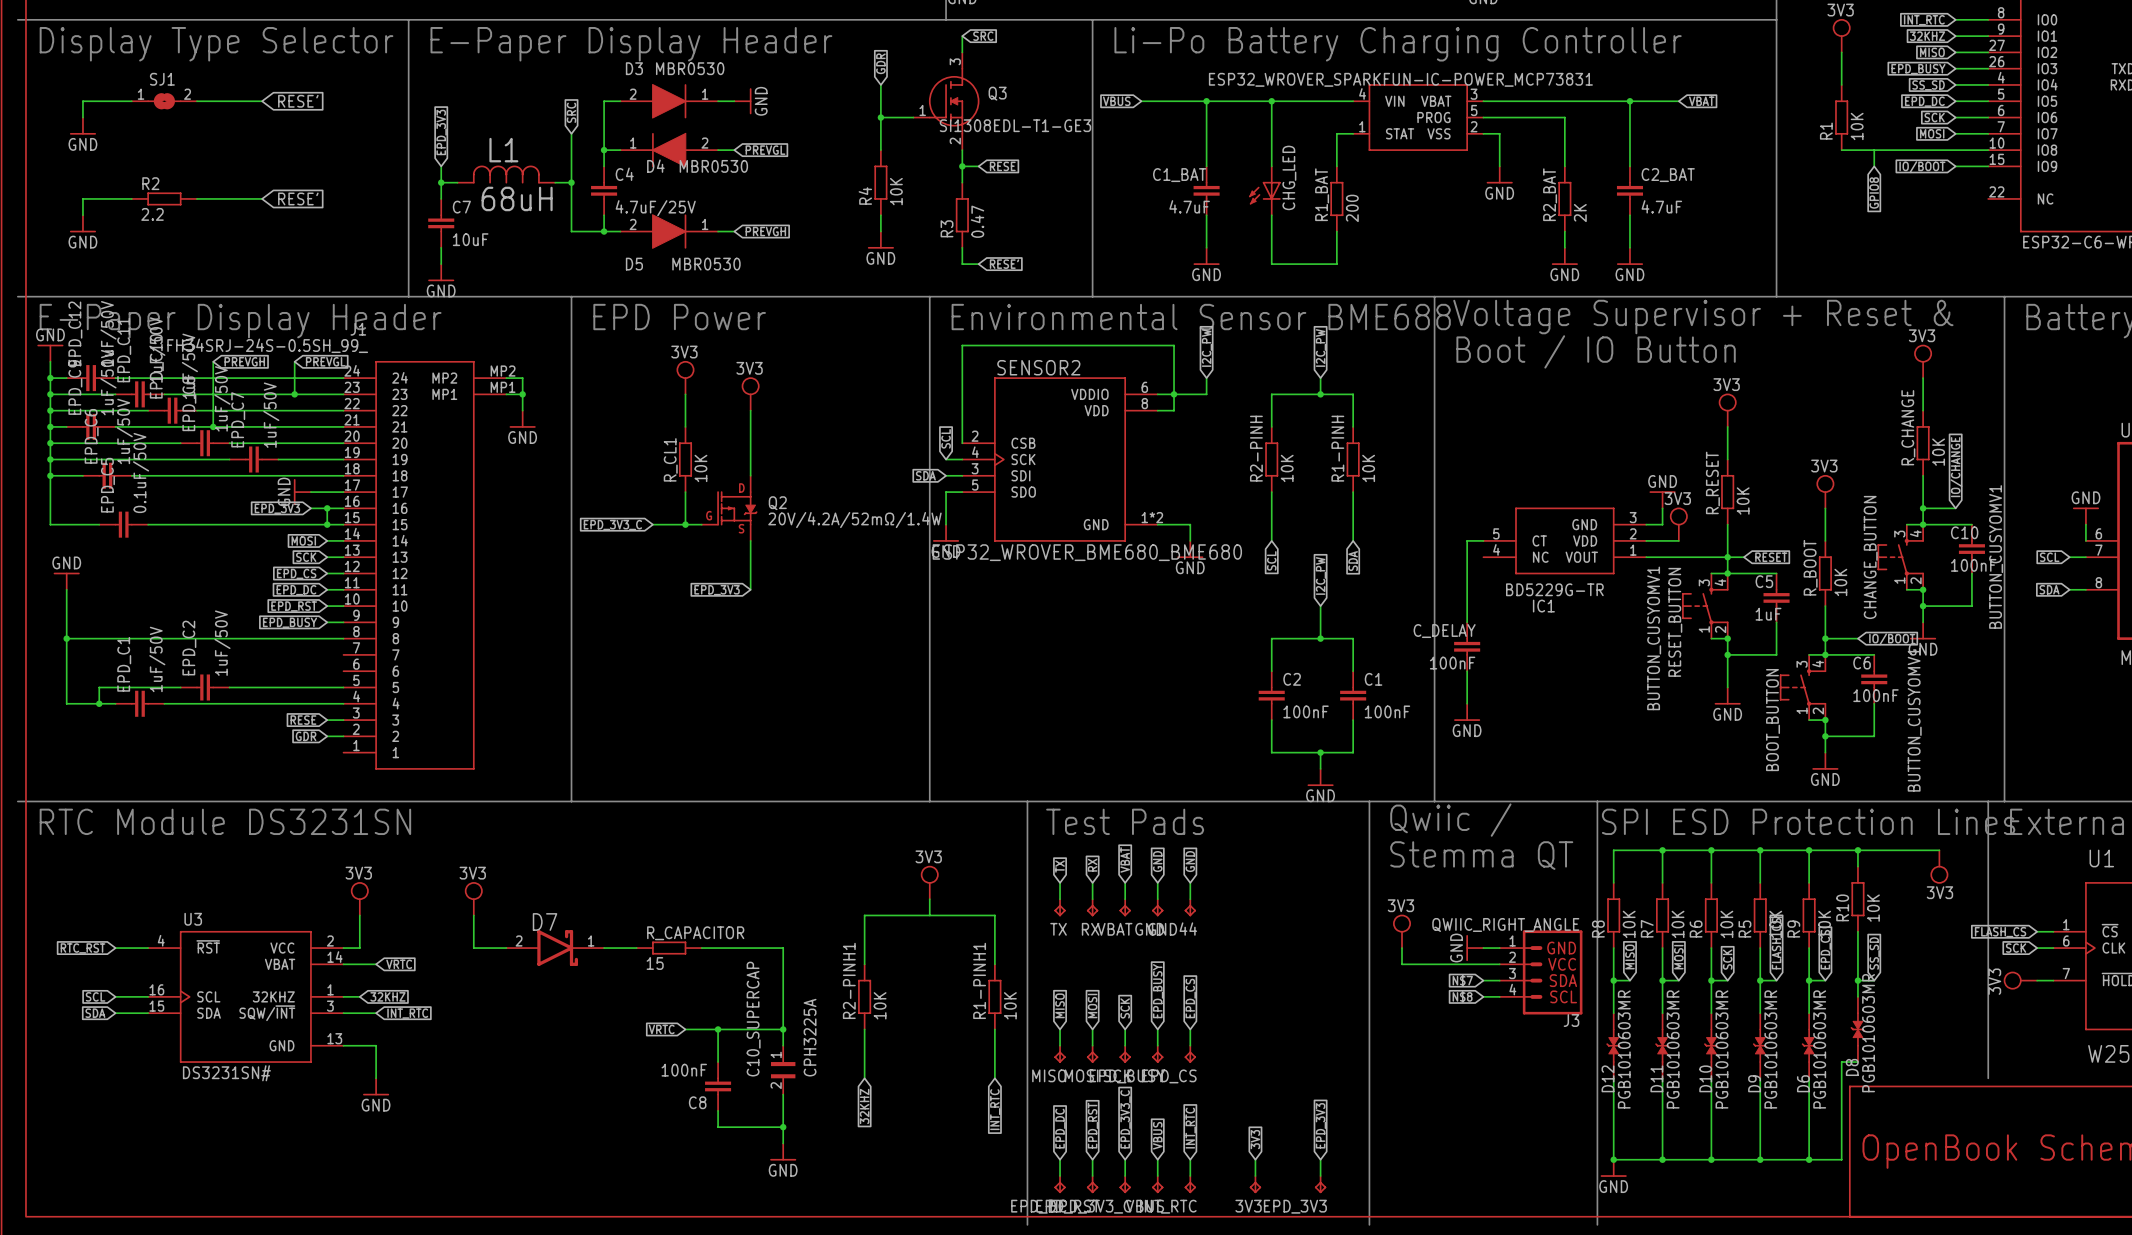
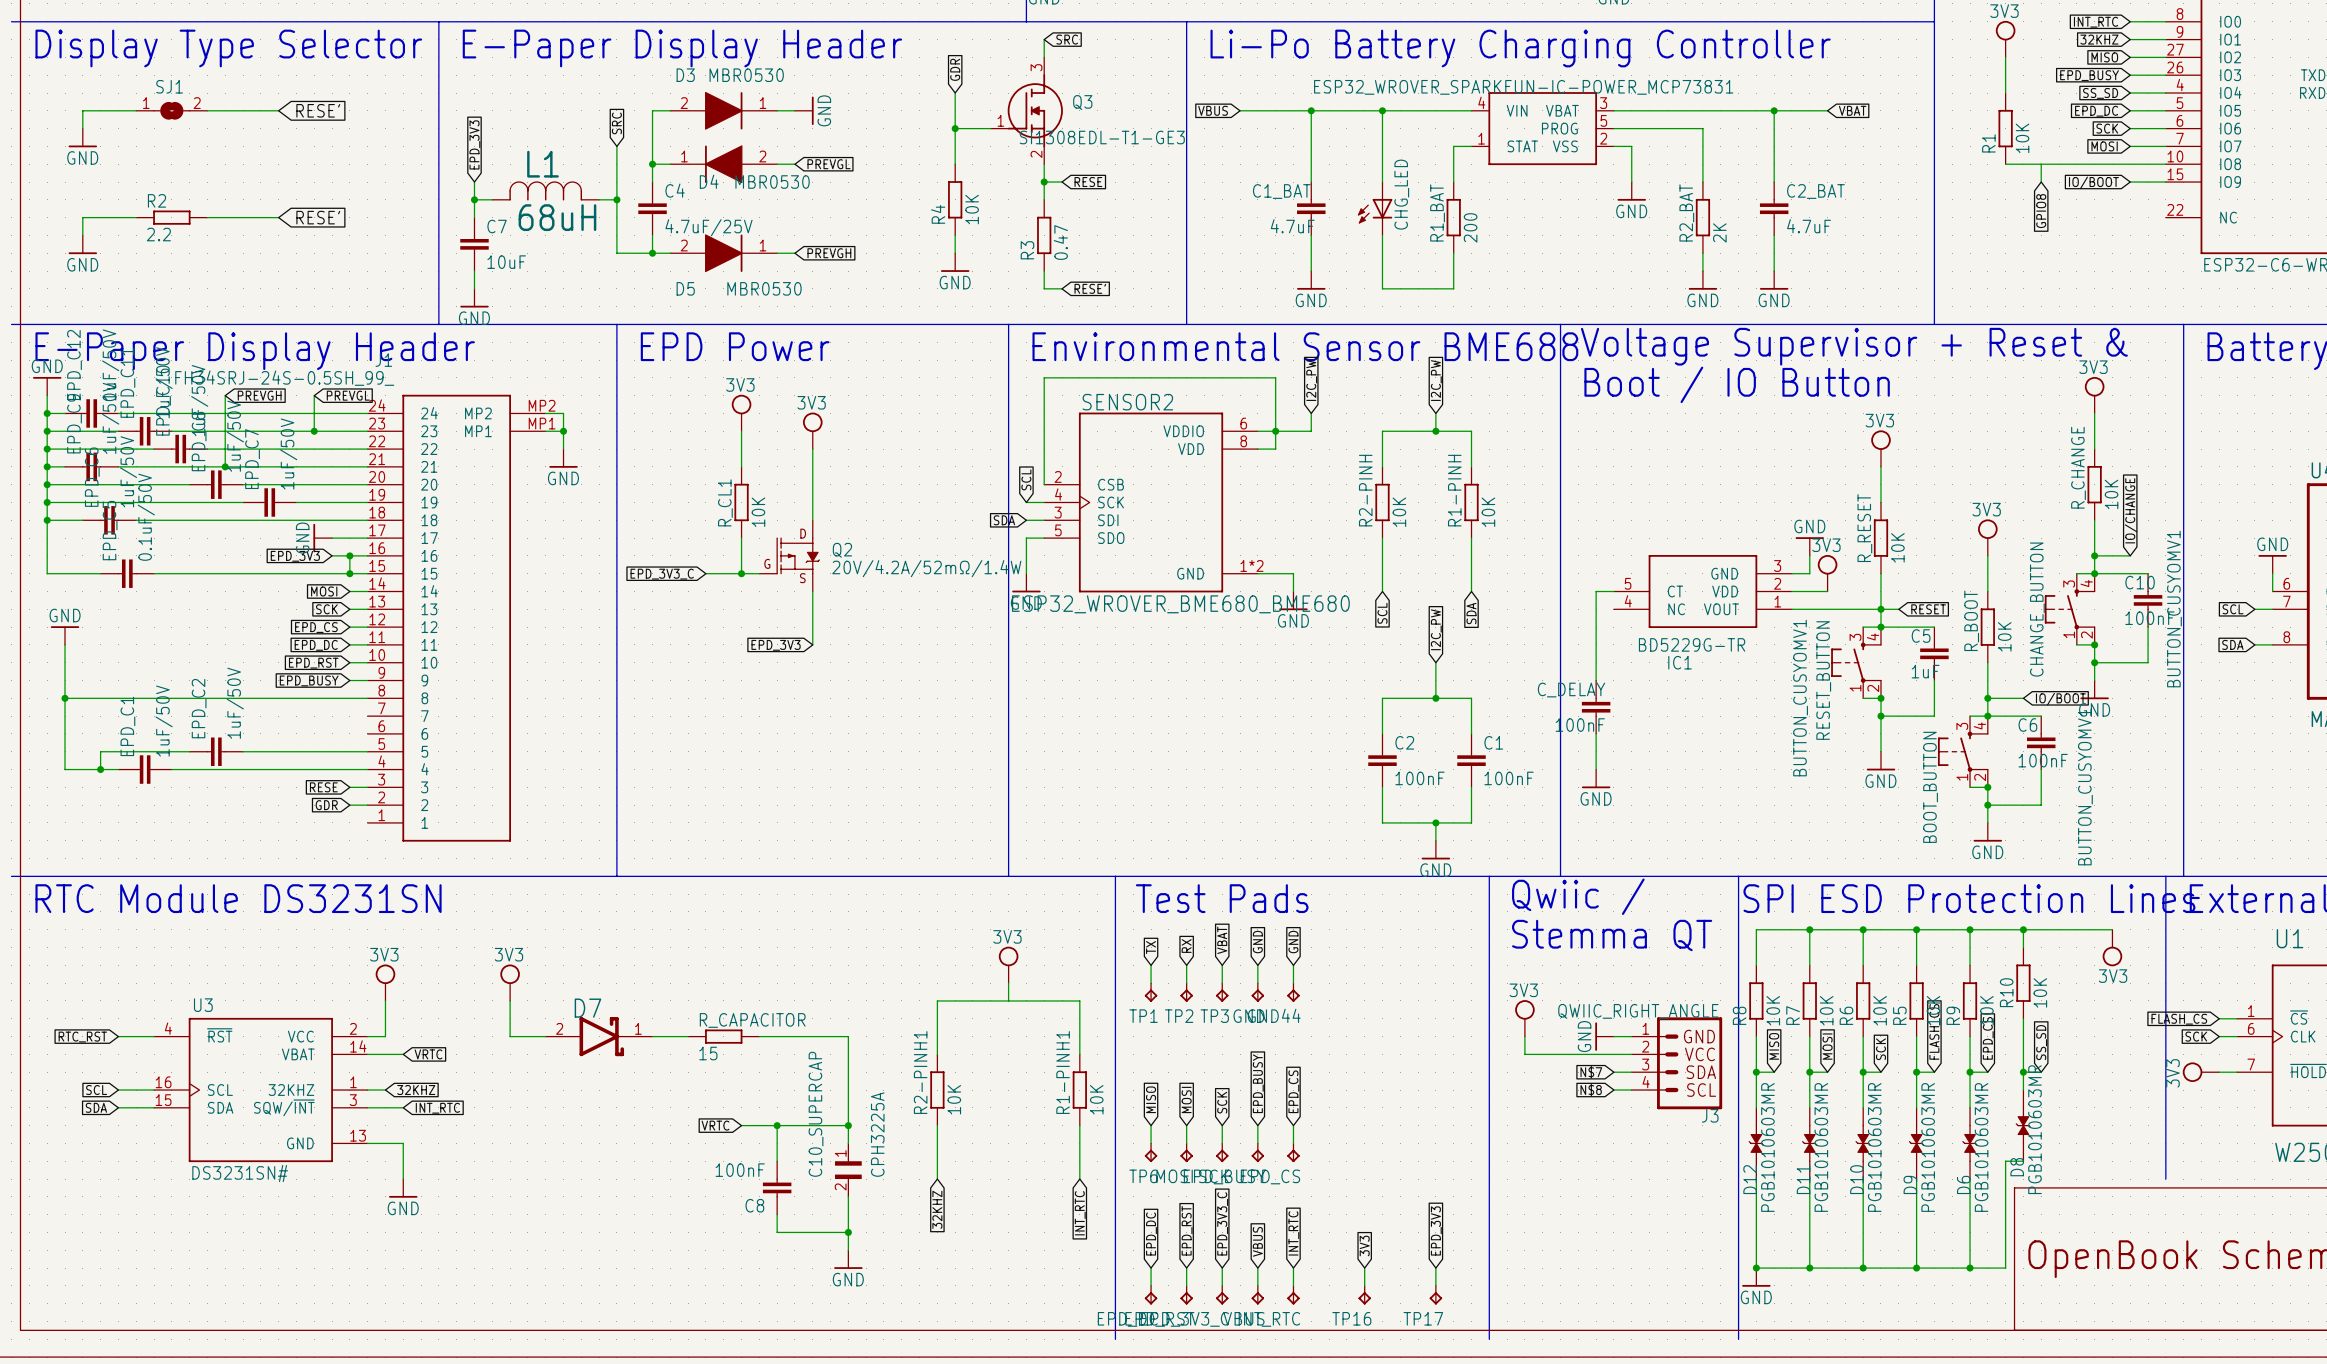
TX name: TX (1058, 929) -> TP1 (1143, 1016)
RX name: RX (1090, 929) -> TP2 (1179, 1016)
VBAT name: VBAT (1114, 929) -> TP3 (1214, 1016)
MISO name: MISO (1049, 1075) -> TP6 (1143, 1176)
3V3 name: 3V3 (1248, 1206) -> TP16 (1351, 1318)
EPD_3V3 name: EPD_3V3 (1295, 1206) -> TP17 (1423, 1318)

